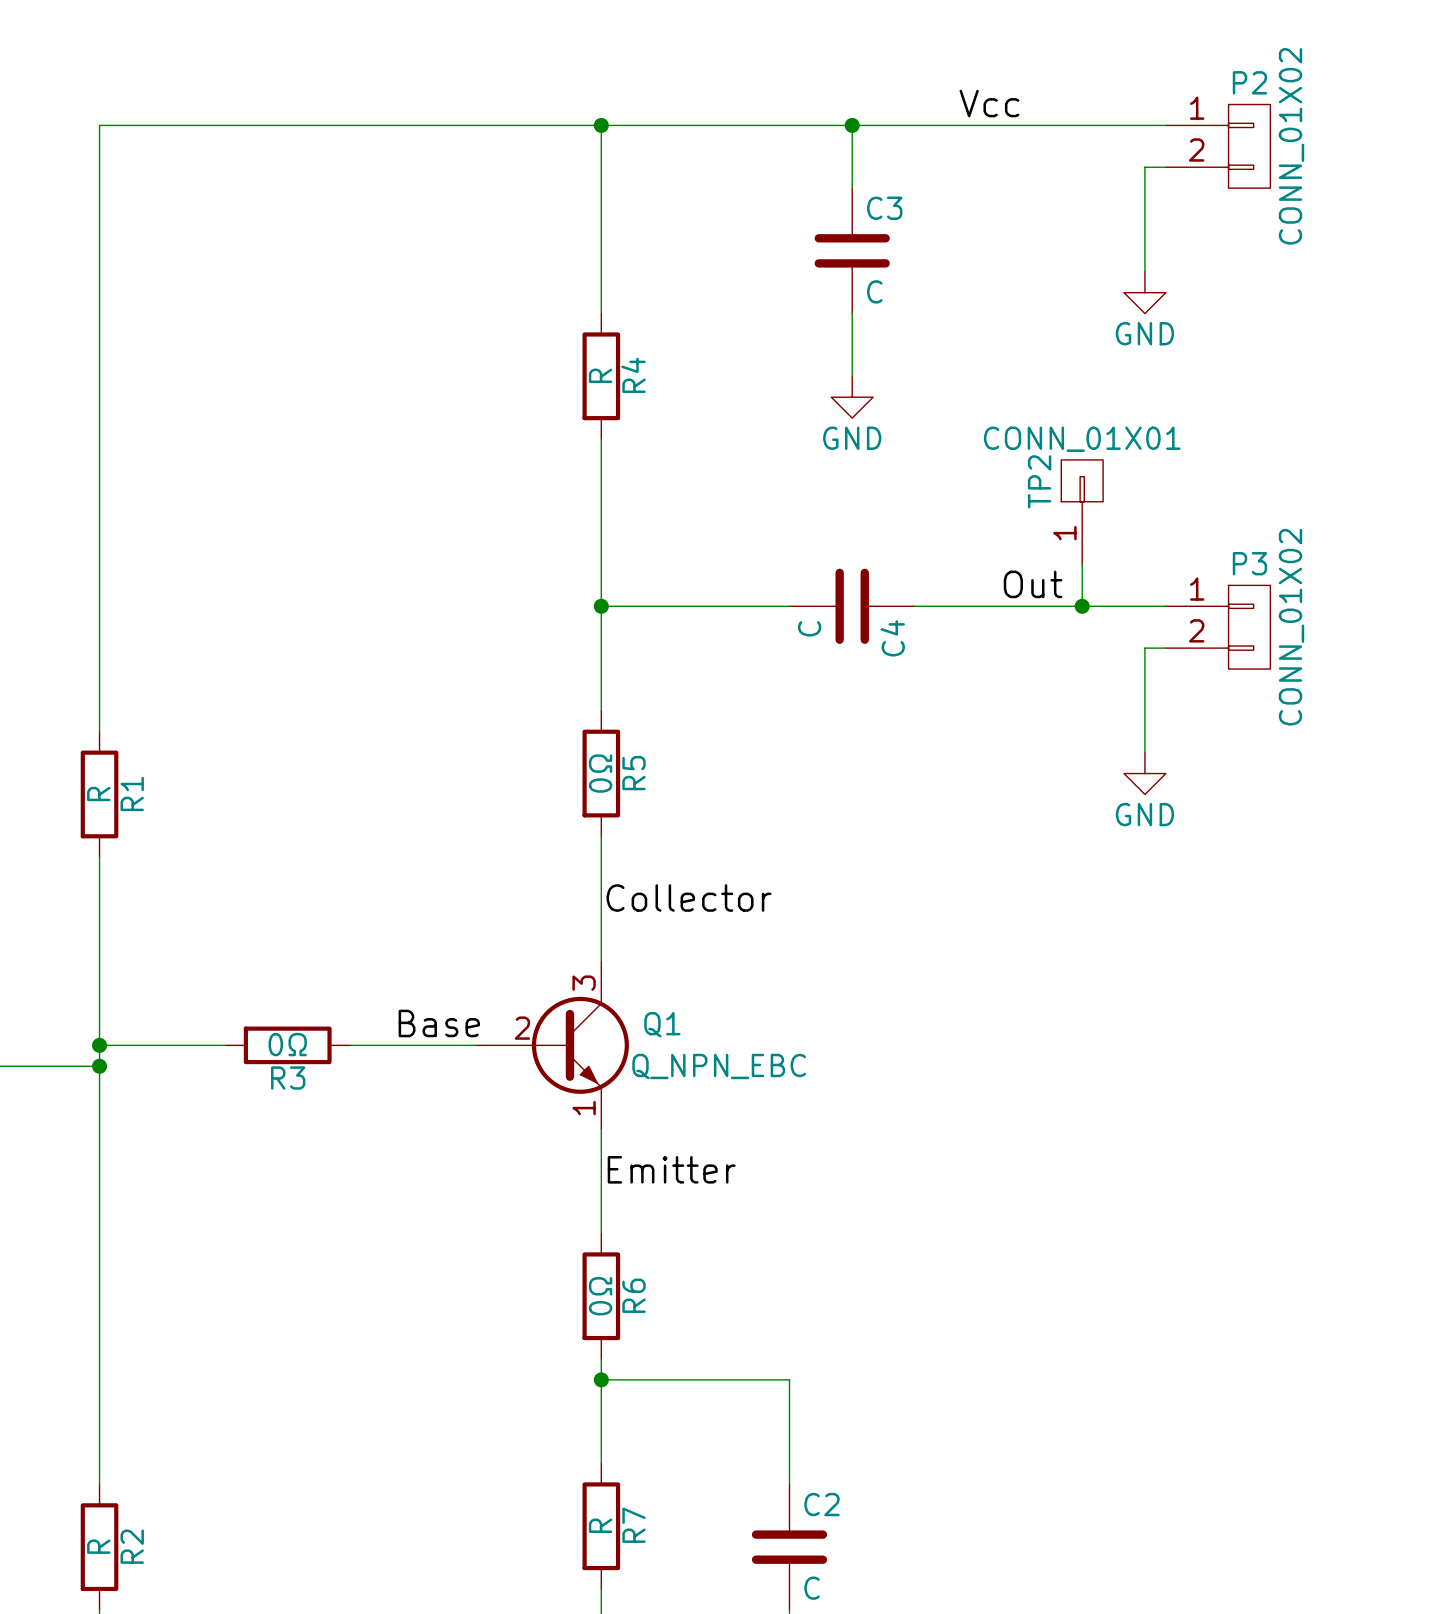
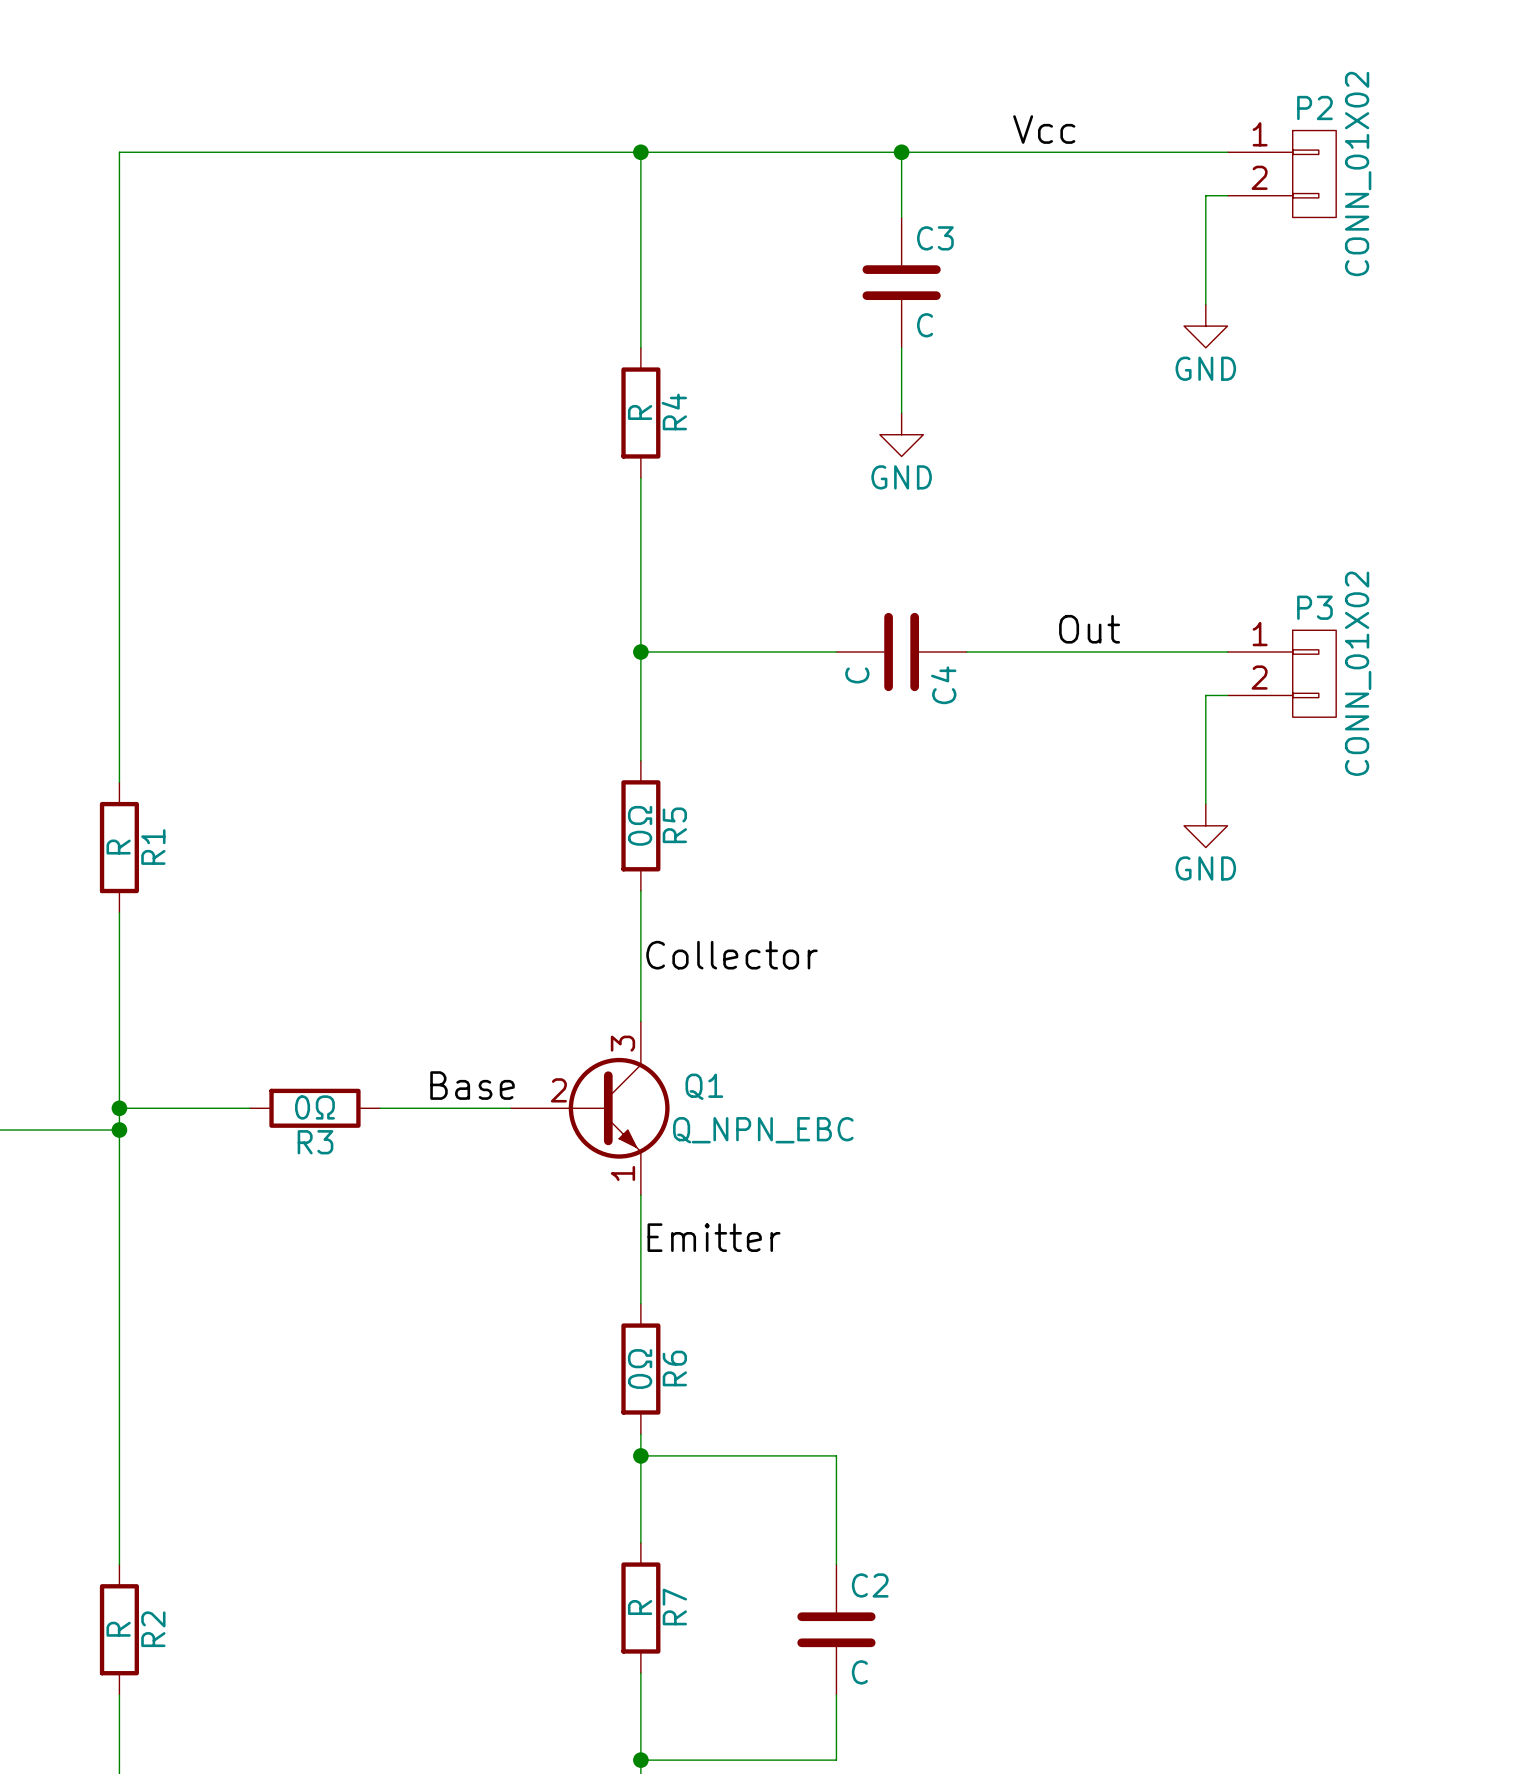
TP2: CONN_01X01 (1082, 512) -> none
wire: (1082, 564) (1082, 606) -> none
junction: (1082, 606) -> none

